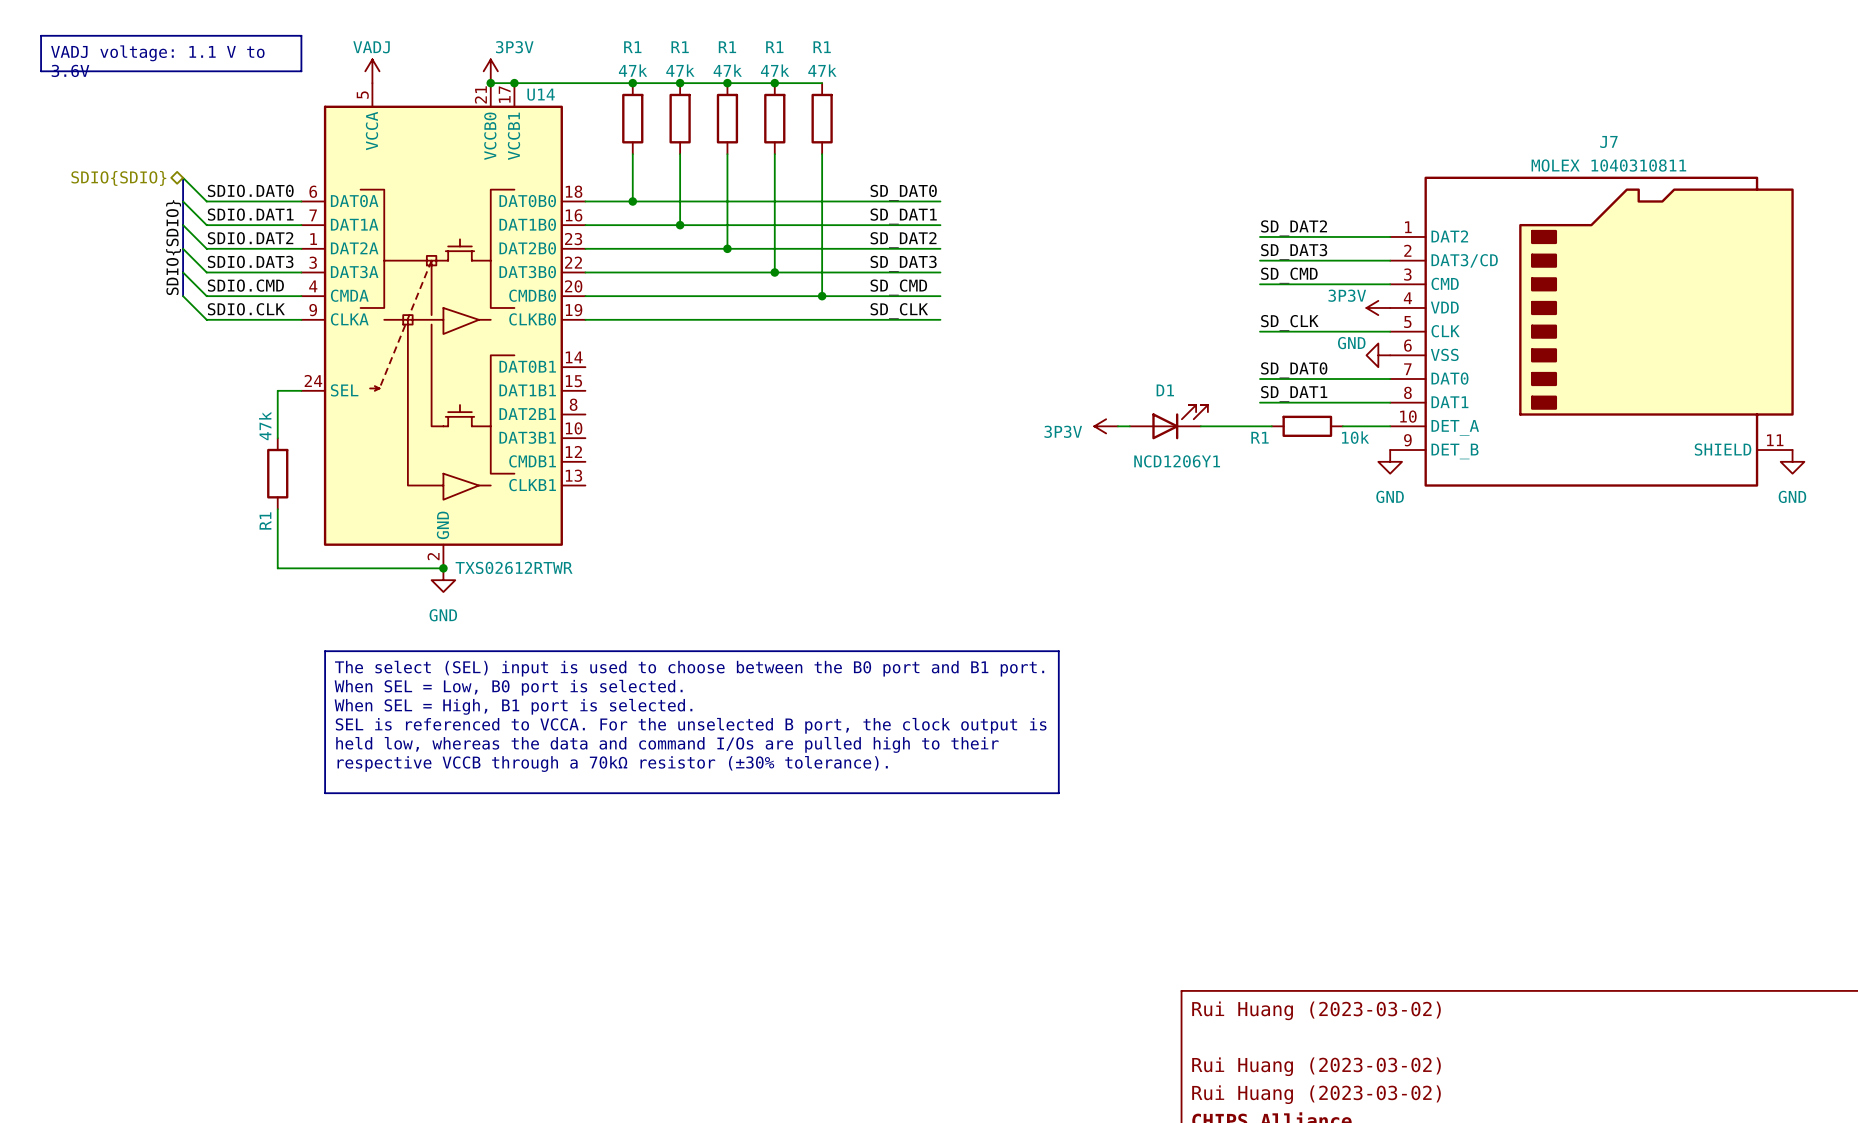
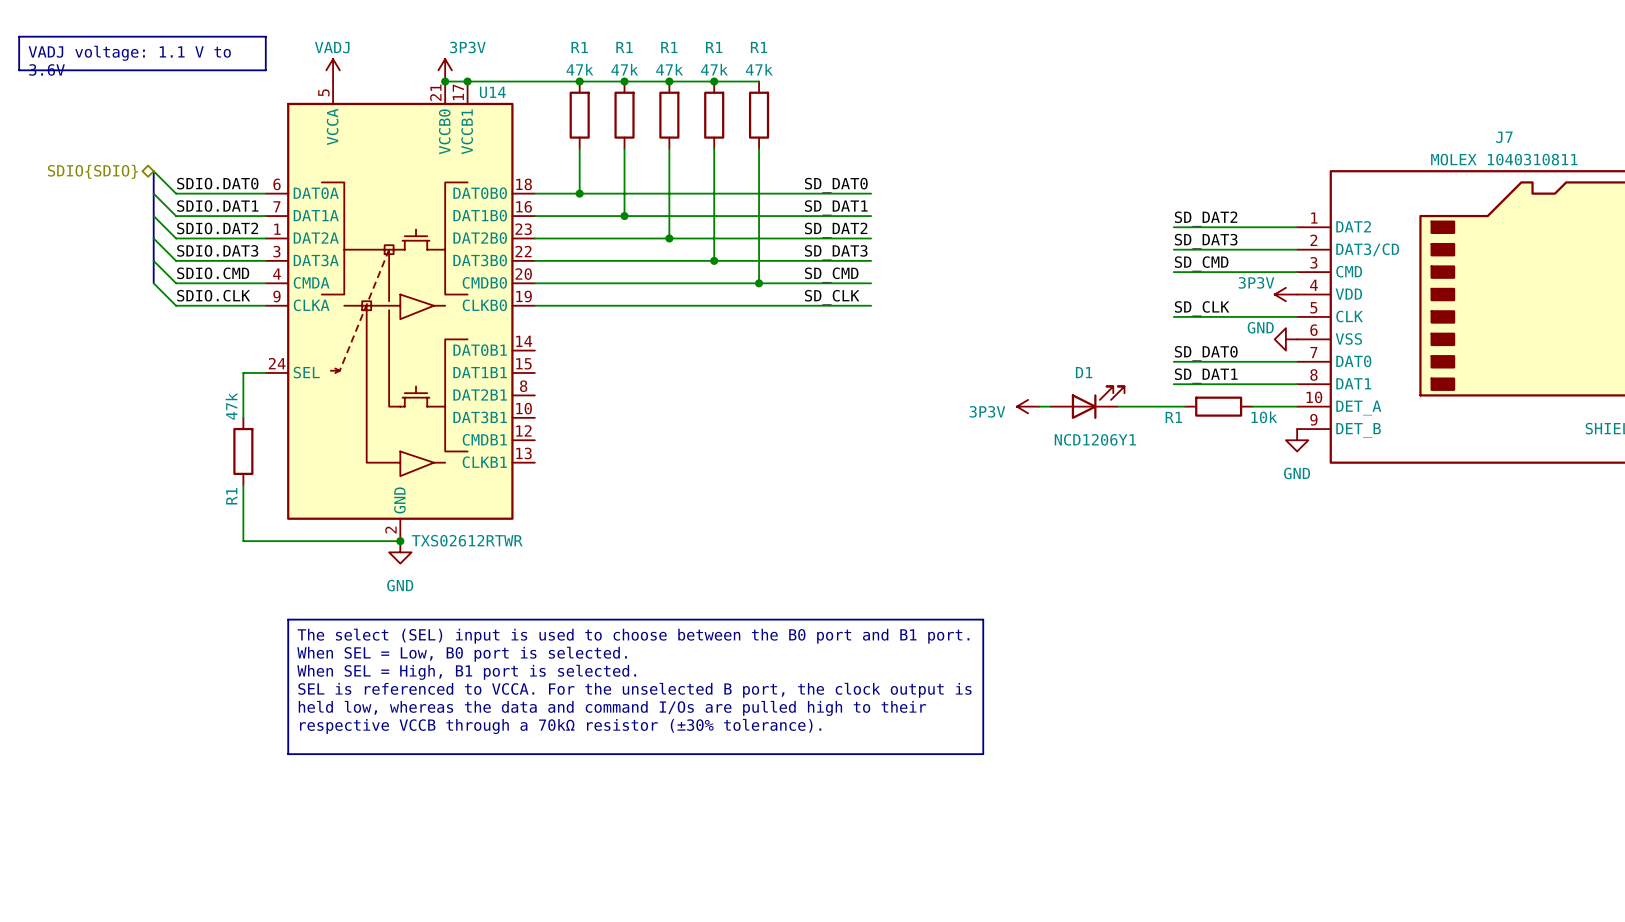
label: SDIO{SDIO} (173, 247) -> none

